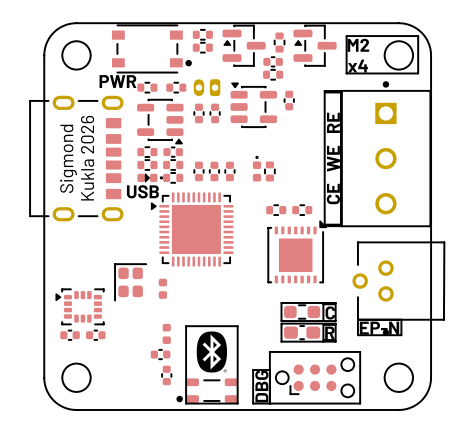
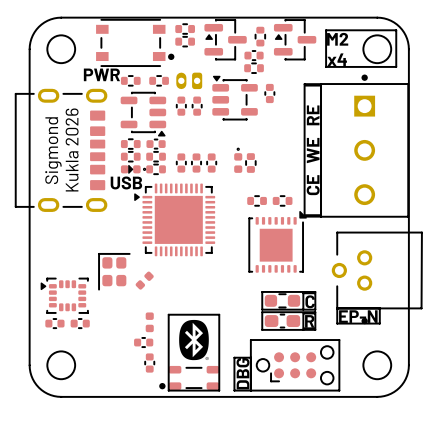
part rotation: 0° (162, 288) -> 45° clockwise (144, 280)

